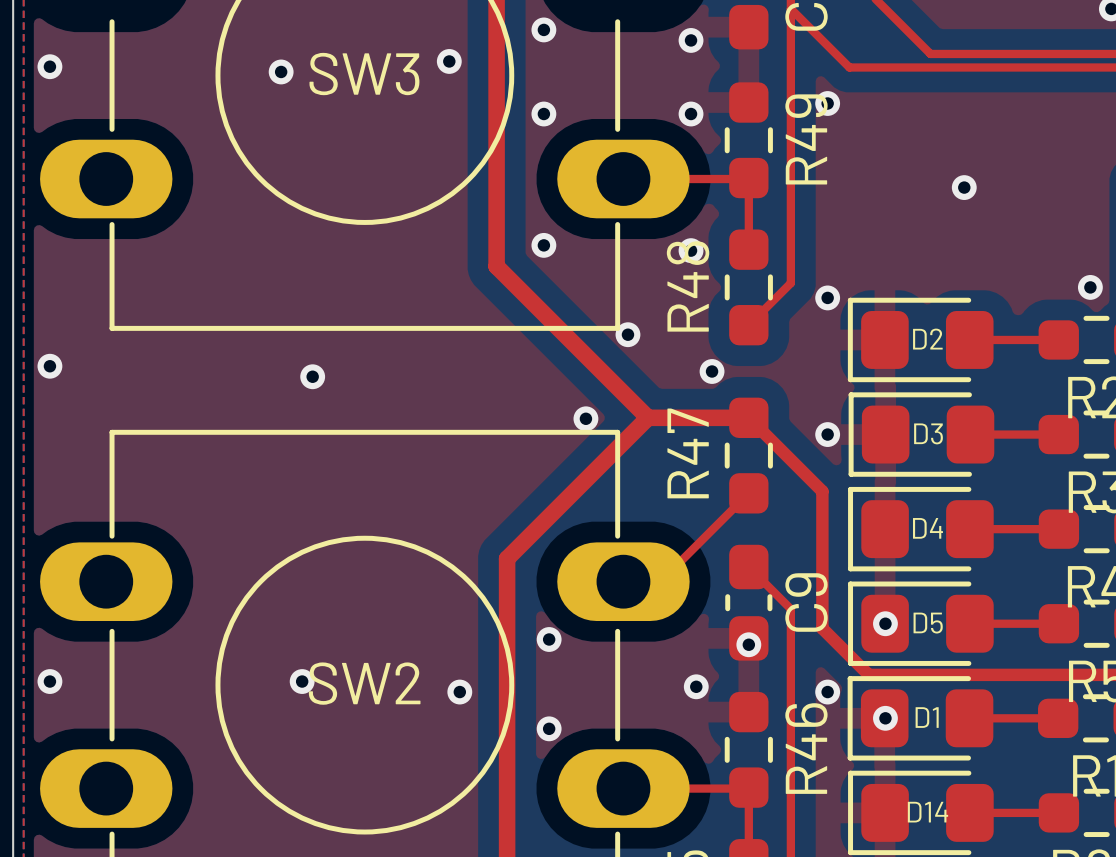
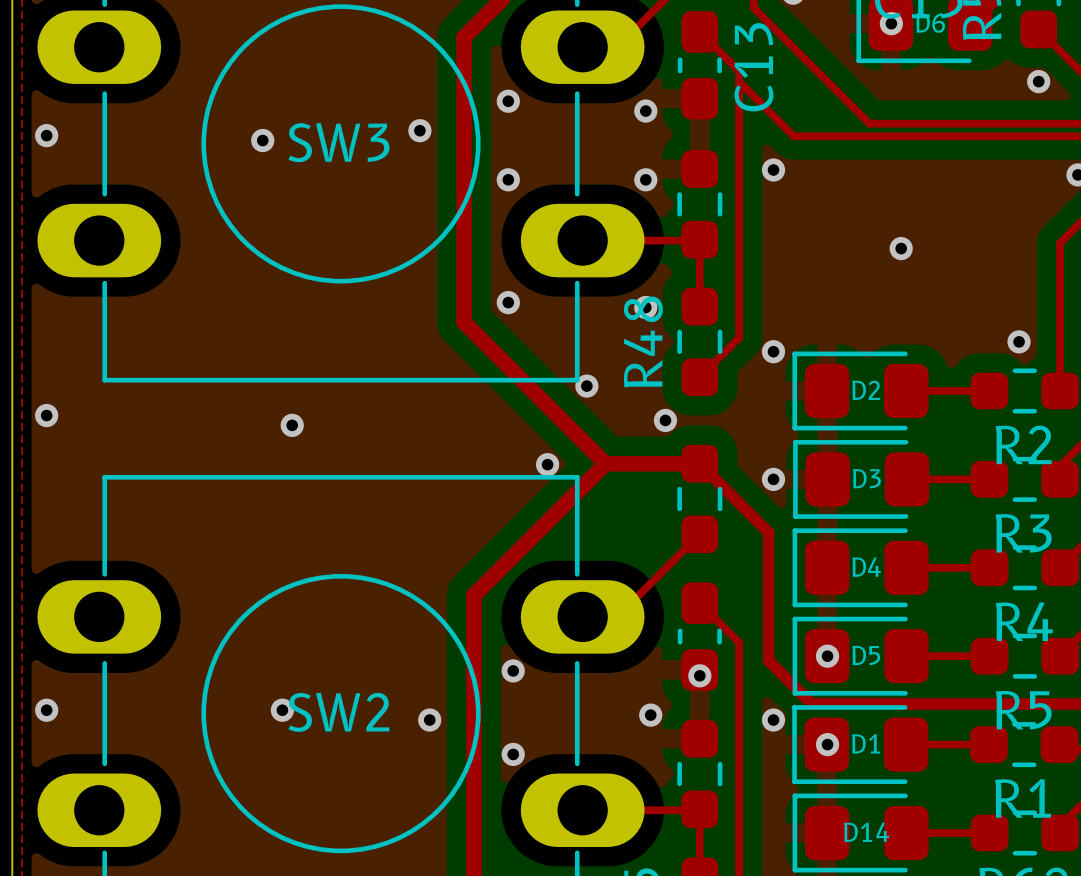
R49 name: R49 (806, 139) -> none
R47 name: R47 (688, 453) -> none
C9 name: C9 (806, 602) -> none
R46 name: R46 (806, 748) -> none

